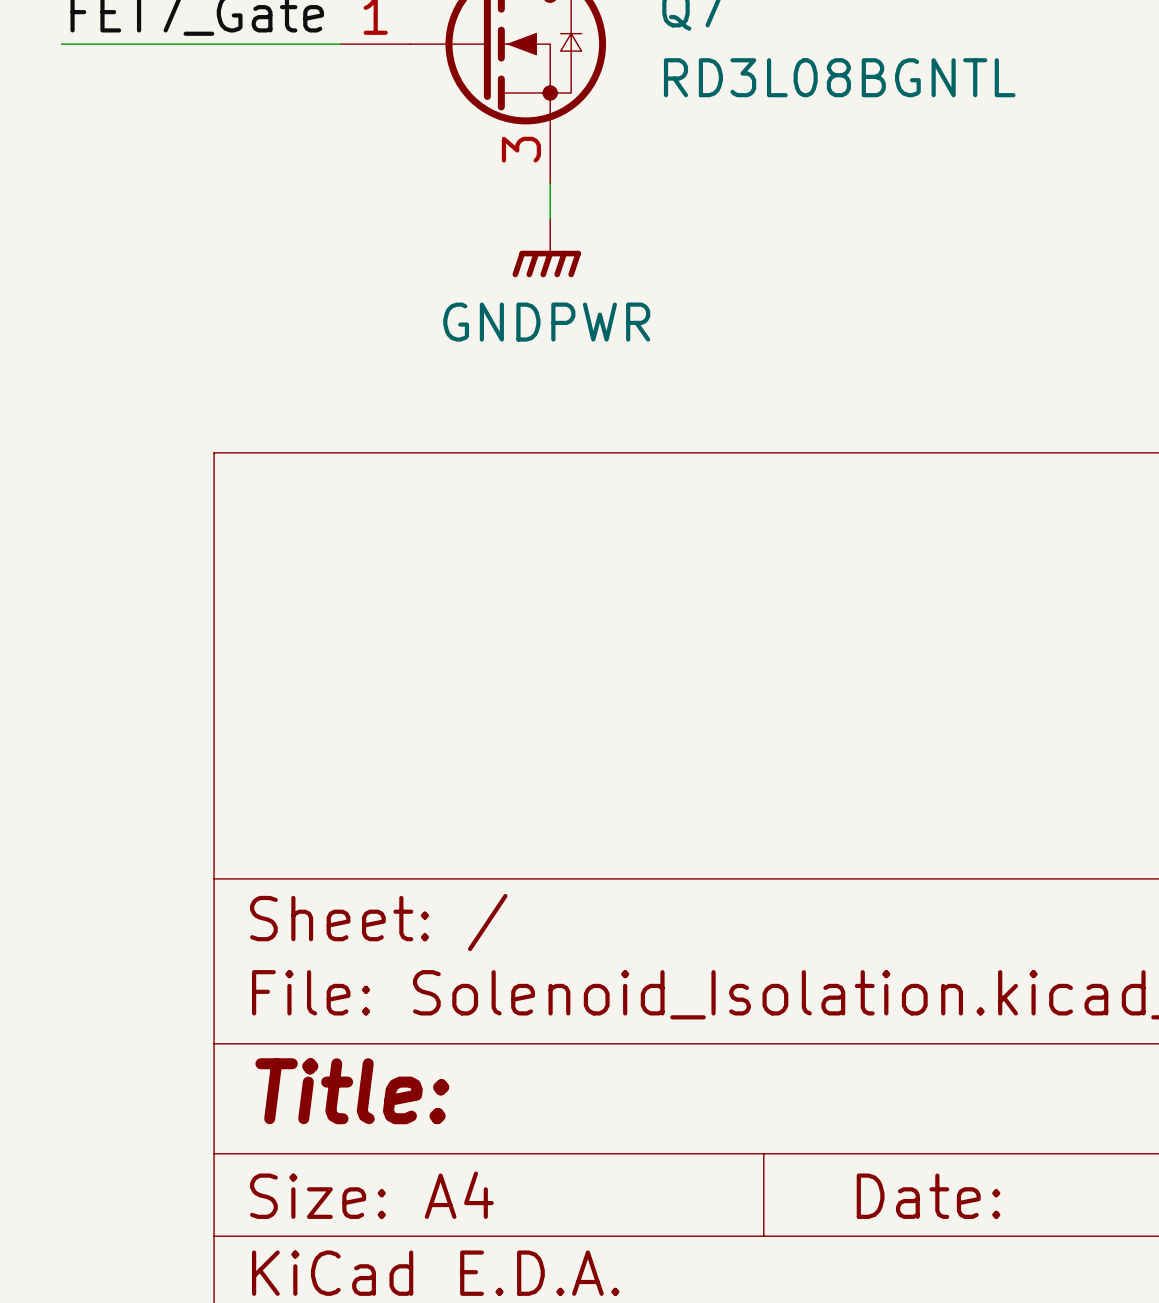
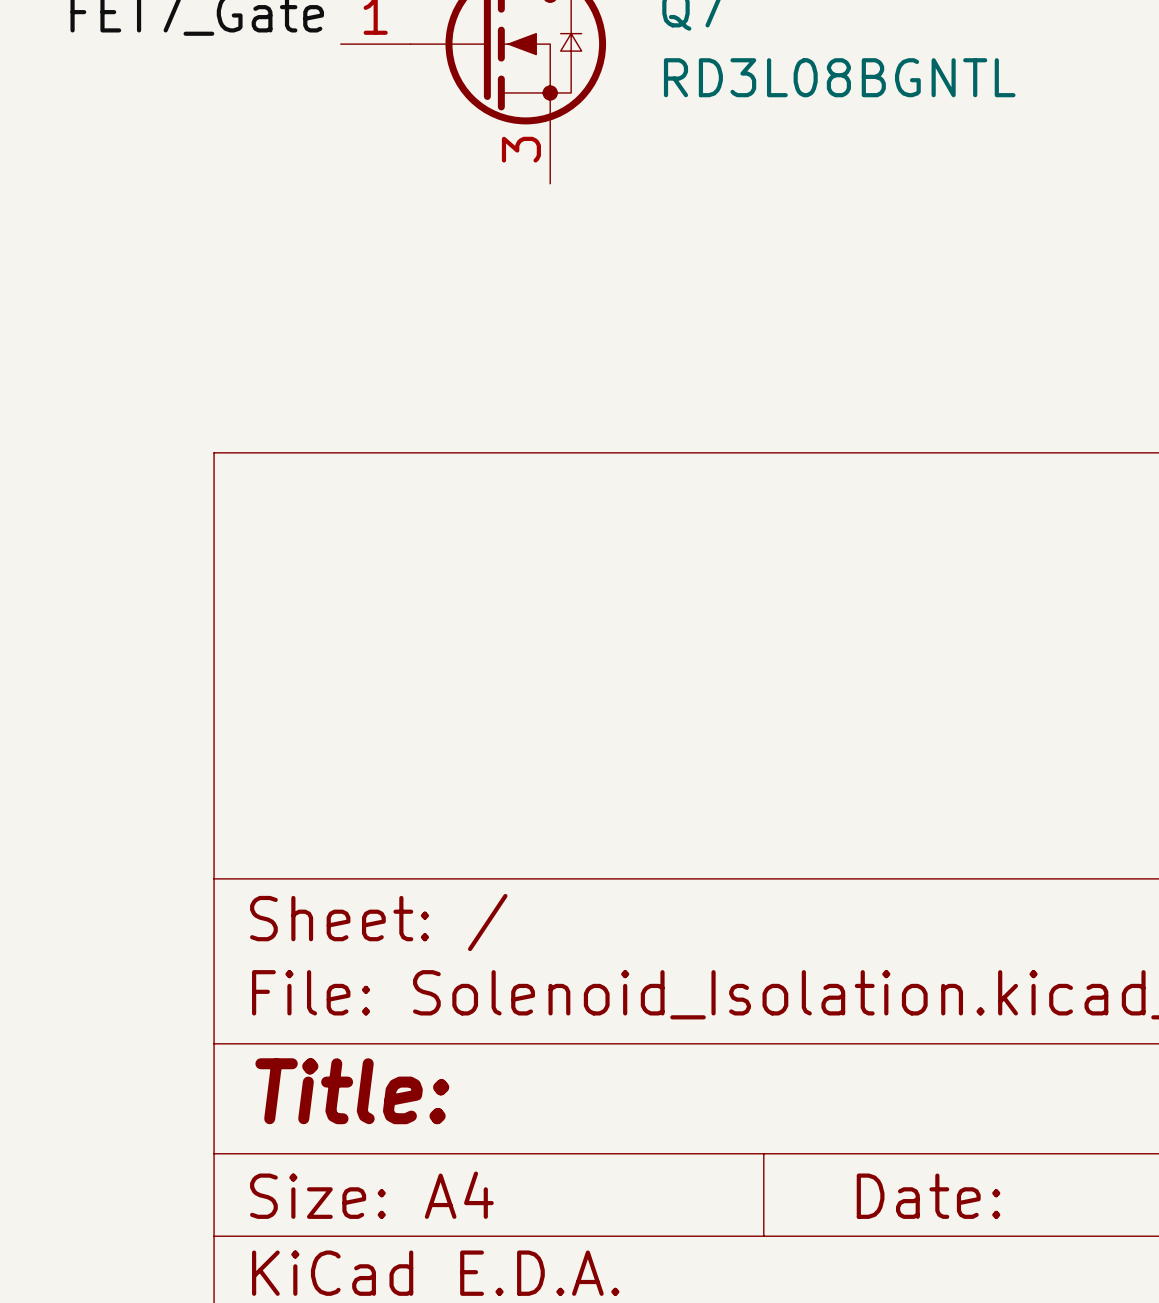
wire: (61, 44) (340, 44) -> none
wire: (550, 183) (550, 218) -> none
power symbol: GNDPWR (546, 247) -> none

